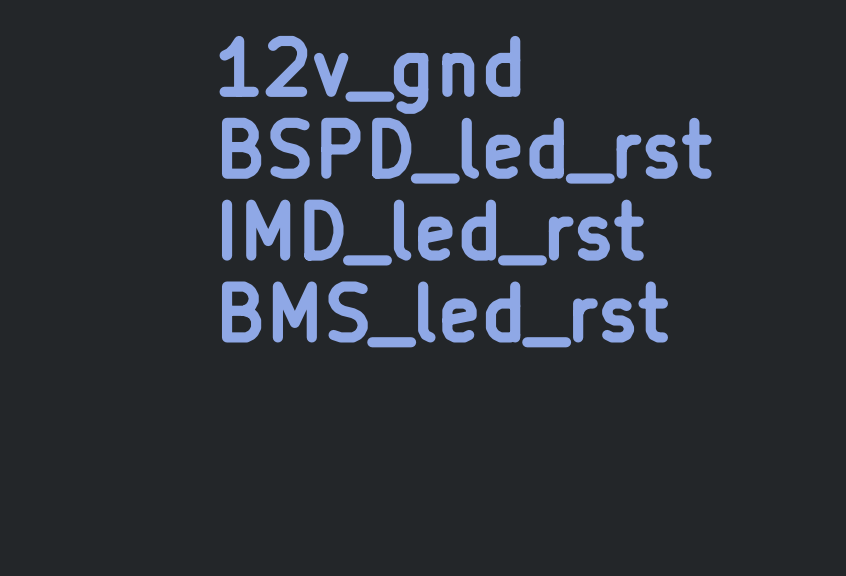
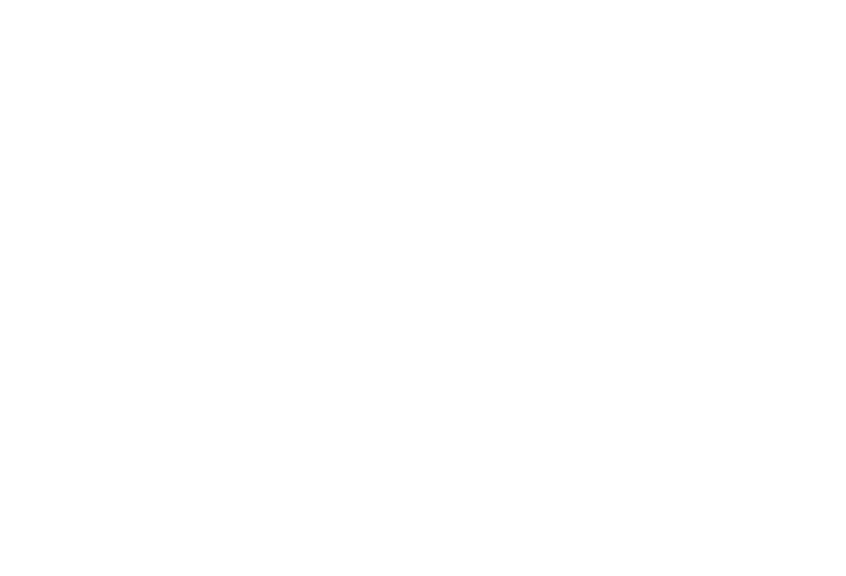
text: 12v_gnd (369, 74) -> none
text: BSPD_led_rst (466, 150) -> none
text: IMD_led_rst (432, 232) -> none
text: BMS_led_rst (444, 314) -> none

